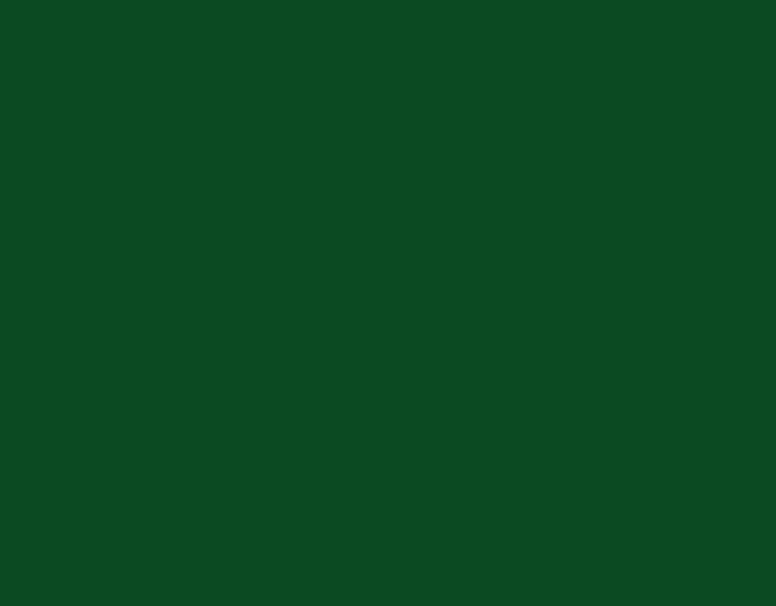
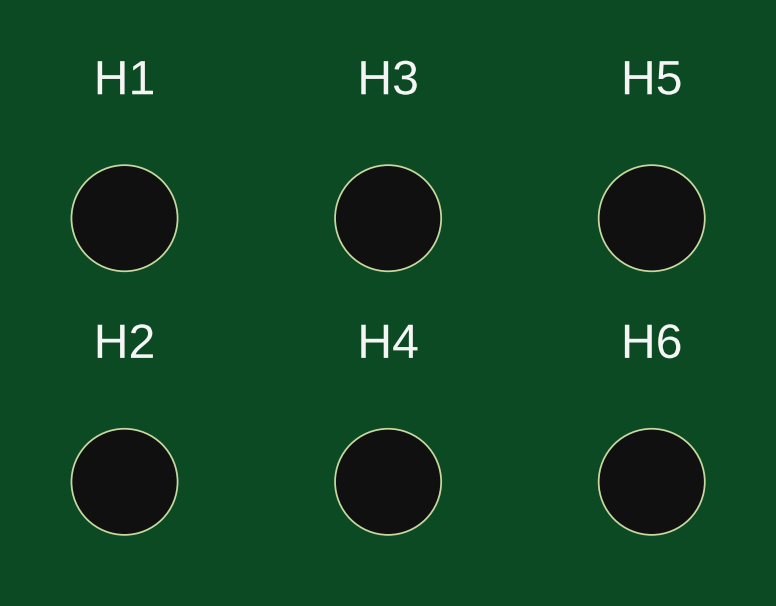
H1: none -> (124, 218)
H3: none -> (388, 218)
H5: none -> (651, 218)
H2: none -> (124, 481)
H4: none -> (388, 481)
H6: none -> (651, 481)

